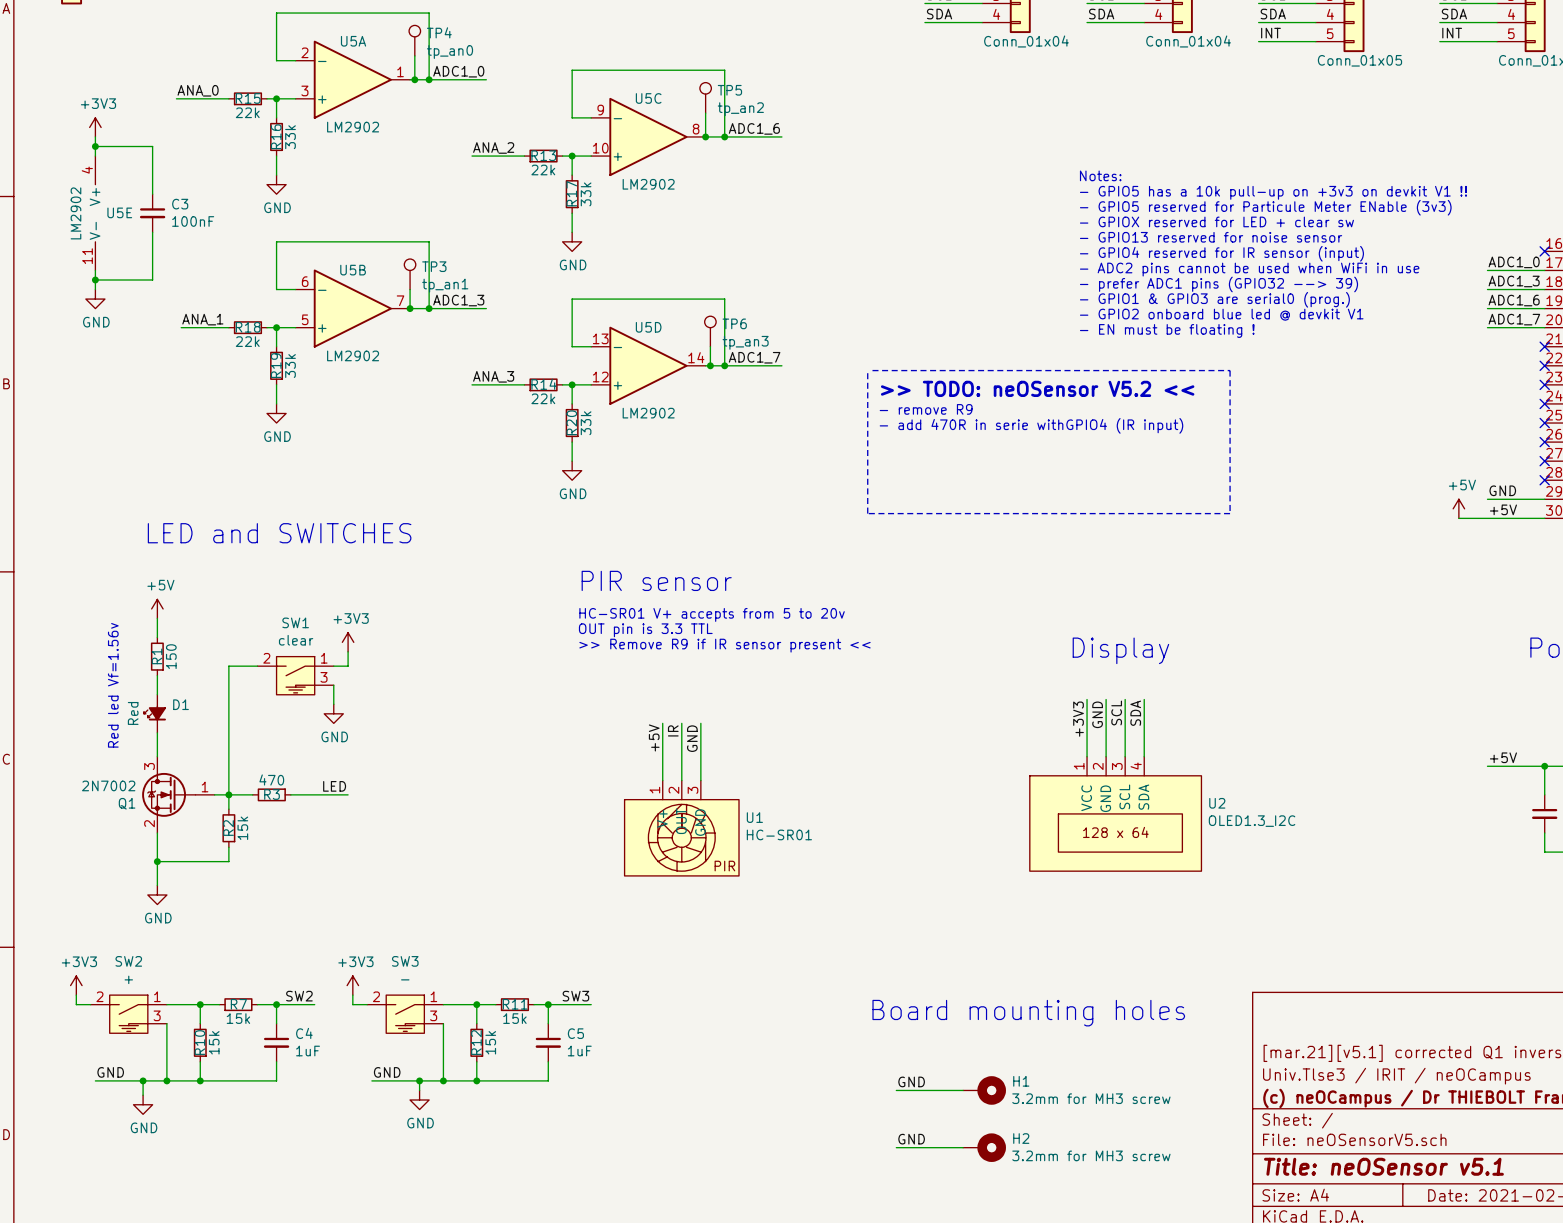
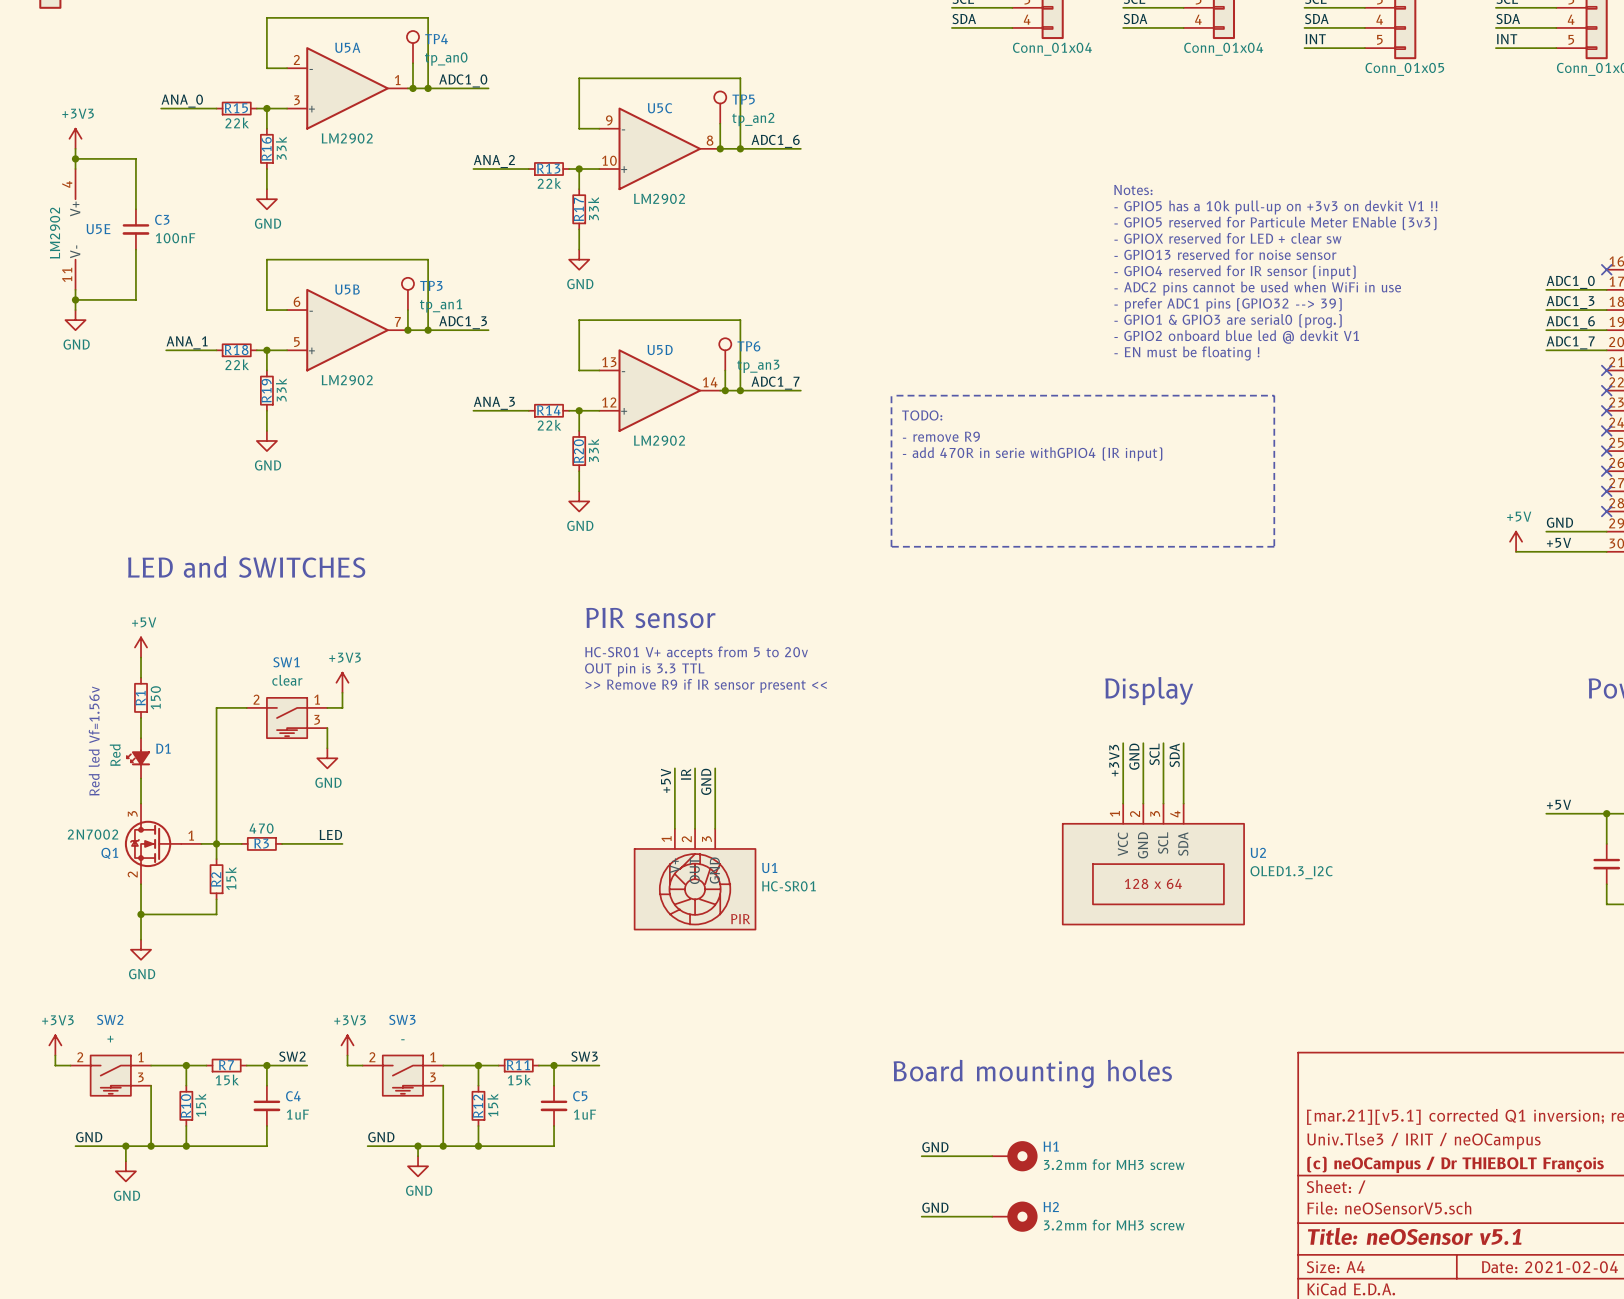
text: >> TODO: neOSensor V5.2 << (1037, 388) -> TODO: (922, 415)

